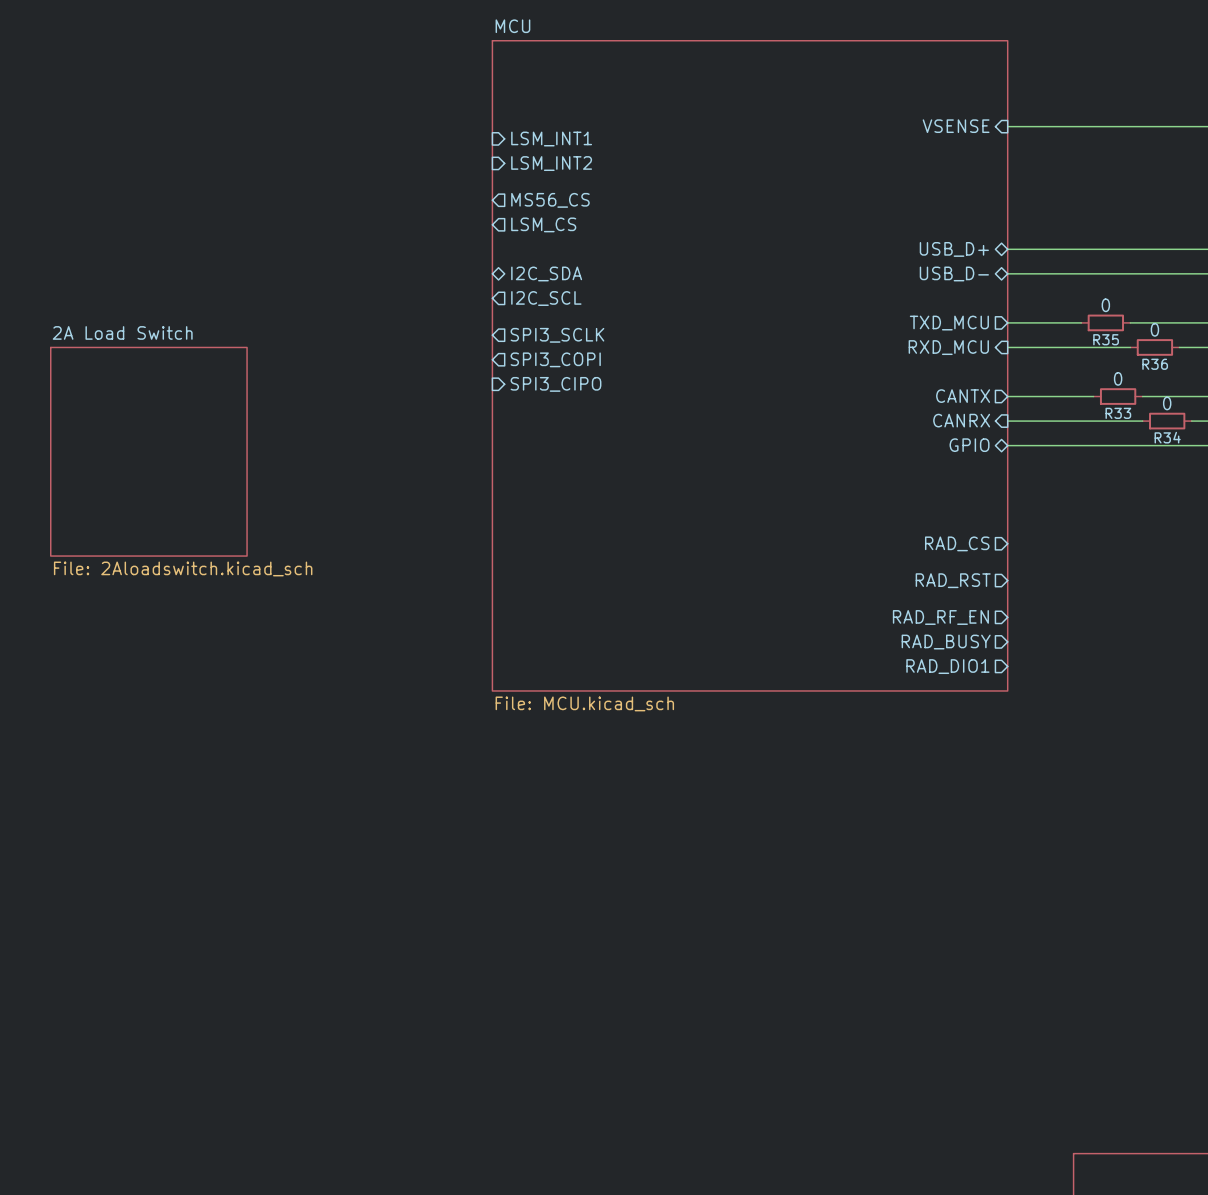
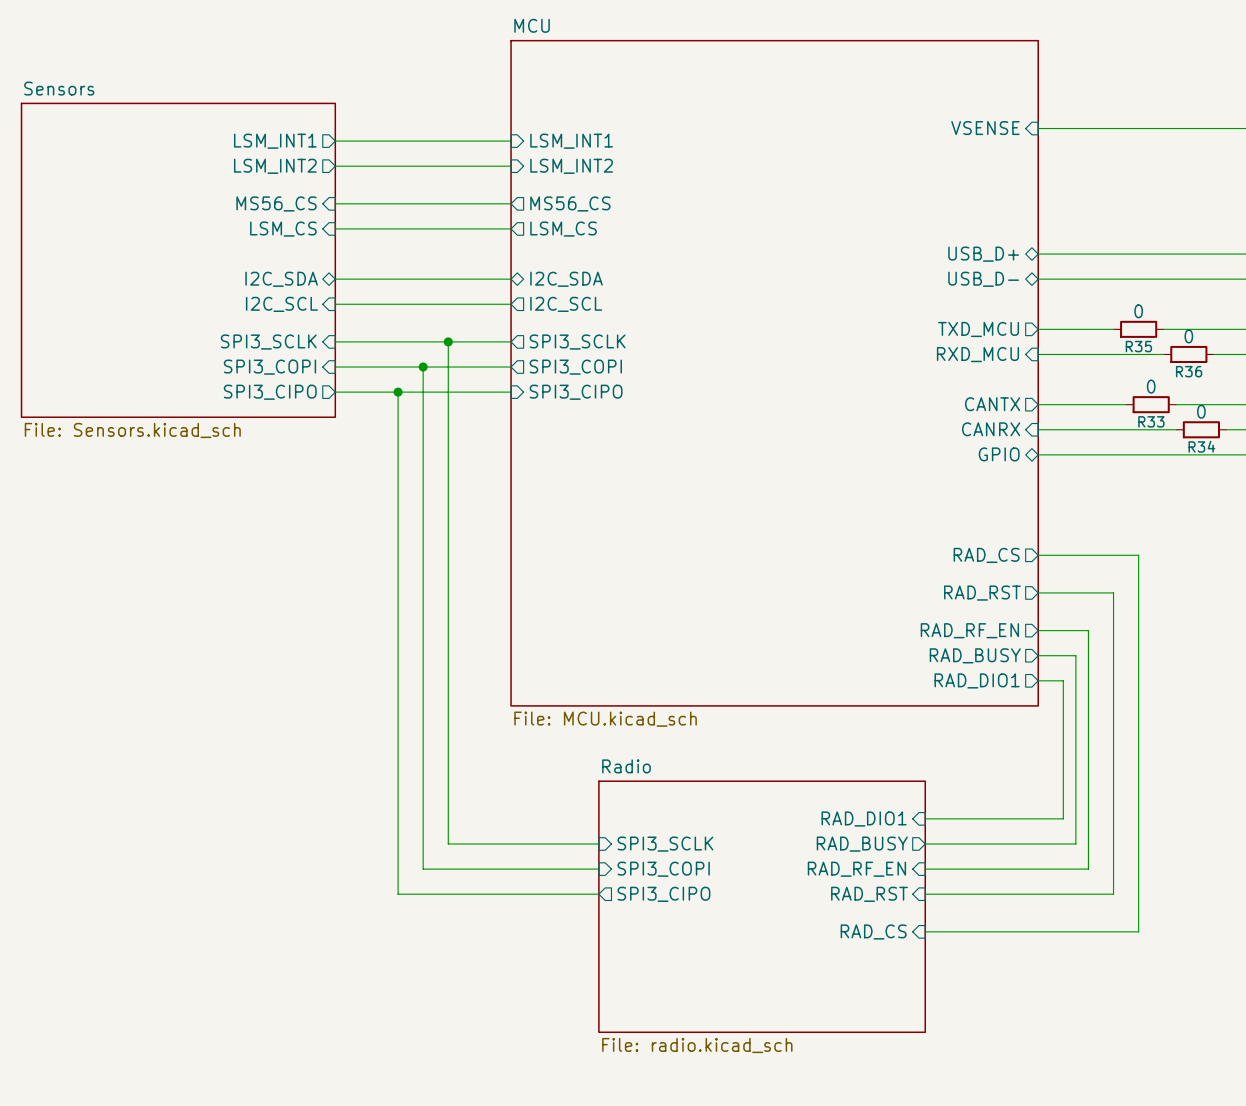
wire: none -> (335, 141) (511, 141)
sheet pin: none -> LSM_INT1 (275, 141)
sheet pin: none -> LSM_INT2 (275, 166)
wire: none -> (335, 166) (511, 166)
sheet pin: none -> MS56_CS (276, 203)
wire: none -> (335, 203) (511, 203)
sheet pin: none -> LSM_CS (283, 229)
wire: none -> (335, 228) (511, 228)
sheet Sensors: none -> File: Sensors.kicad_sch (178, 260)
sheet pin: none -> I2C_SDA (281, 279)
wire: none -> (335, 279) (511, 279)
sheet pin: none -> I2C_SCL (281, 304)
wire: none -> (335, 304) (511, 304)
sheet pin: none -> SPI3_SCLK (268, 342)
wire: none -> (335, 341) (511, 341)
wire: none -> (448, 341) (448, 843) (598, 843)
junction: none -> (448, 341)
sheet pin: none -> SPI3_COPI (269, 367)
wire: none -> (335, 367) (511, 367)
wire: none -> (423, 367) (423, 869) (598, 869)
junction: none -> (423, 367)
sheet pin: none -> SPI3_CIPO (270, 392)
wire: none -> (335, 392) (511, 392)
wire: none -> (398, 392) (398, 894) (598, 894)
junction: none -> (398, 392)
sheet 2A Load Switch: File: 2Aloadswitch.kicad_sch (148, 451) -> none
wire: none -> (1038, 555) (1138, 555) (1138, 931) (925, 931)
wire: none -> (1038, 592) (1113, 592) (1113, 894) (925, 894)
wire: none -> (1038, 630) (1088, 630) (1088, 869) (925, 869)
wire: none -> (1038, 655) (1075, 655) (1075, 843) (925, 843)
wire: none -> (1038, 680) (1063, 680) (1063, 818) (925, 818)
sheet pin: none -> RAD_DIO1 (864, 819)
sheet pin: none -> SPI3_SCLK (665, 844)
sheet pin: none -> RAD_BUSY (862, 844)
sheet pin: none -> SPI3_COPI (663, 869)
sheet pin: none -> RAD_RF_EN (856, 869)
sheet pin: none -> SPI3_CIPO (663, 894)
sheet pin: none -> RAD_RST (869, 894)
sheet Radio: none -> File: radio.kicad_sch (762, 906)
sheet pin: none -> RAD_CS (873, 931)

